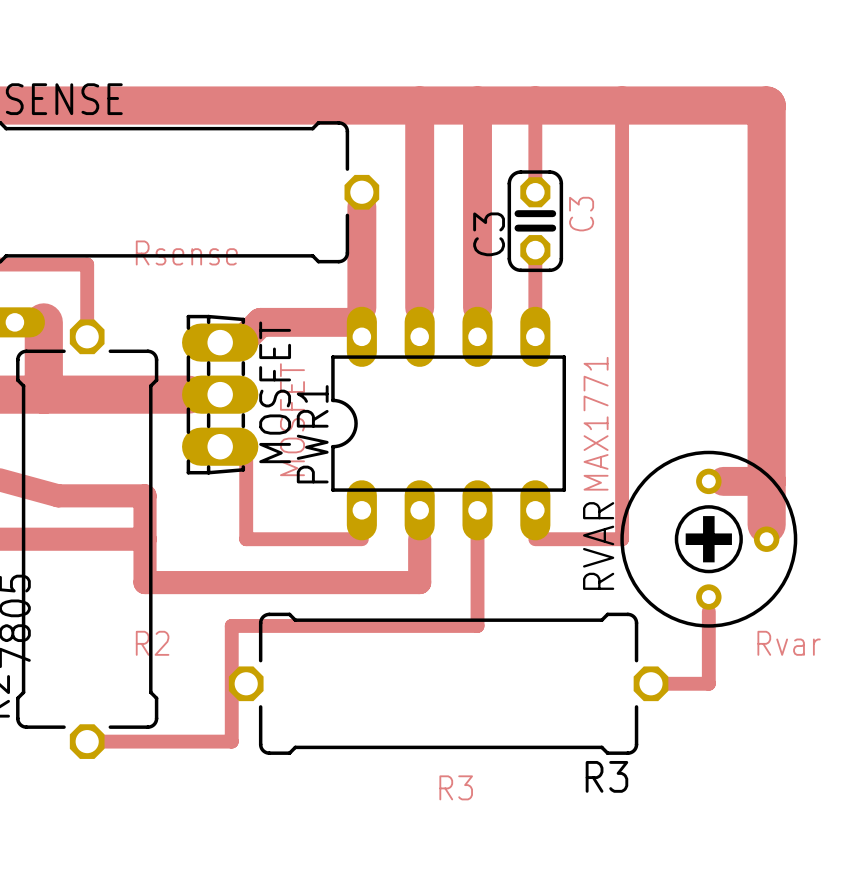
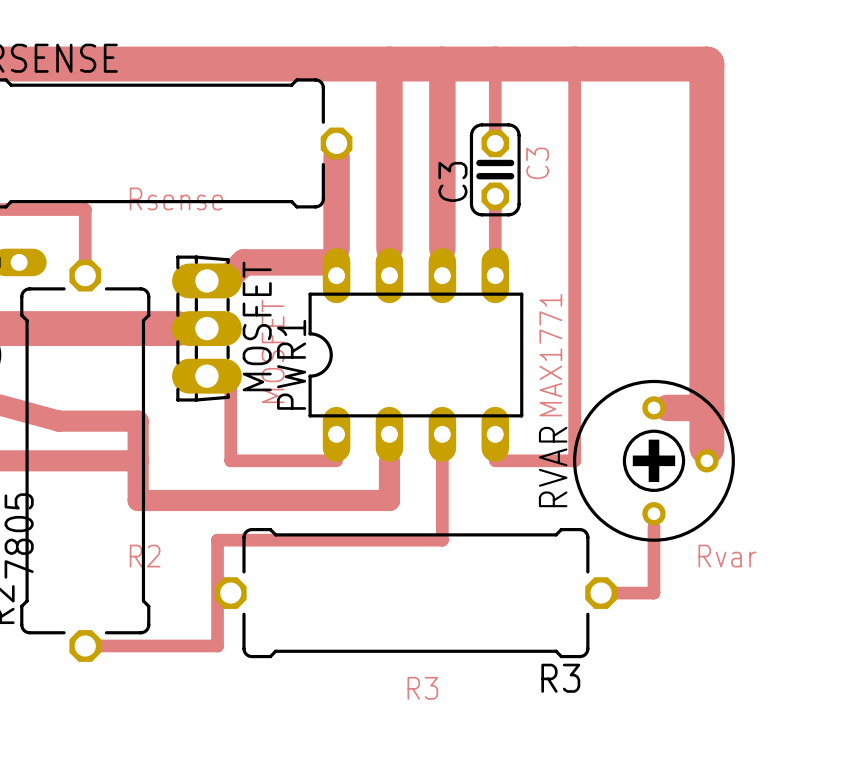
top track: (43, 322) (43, 394) -> none

